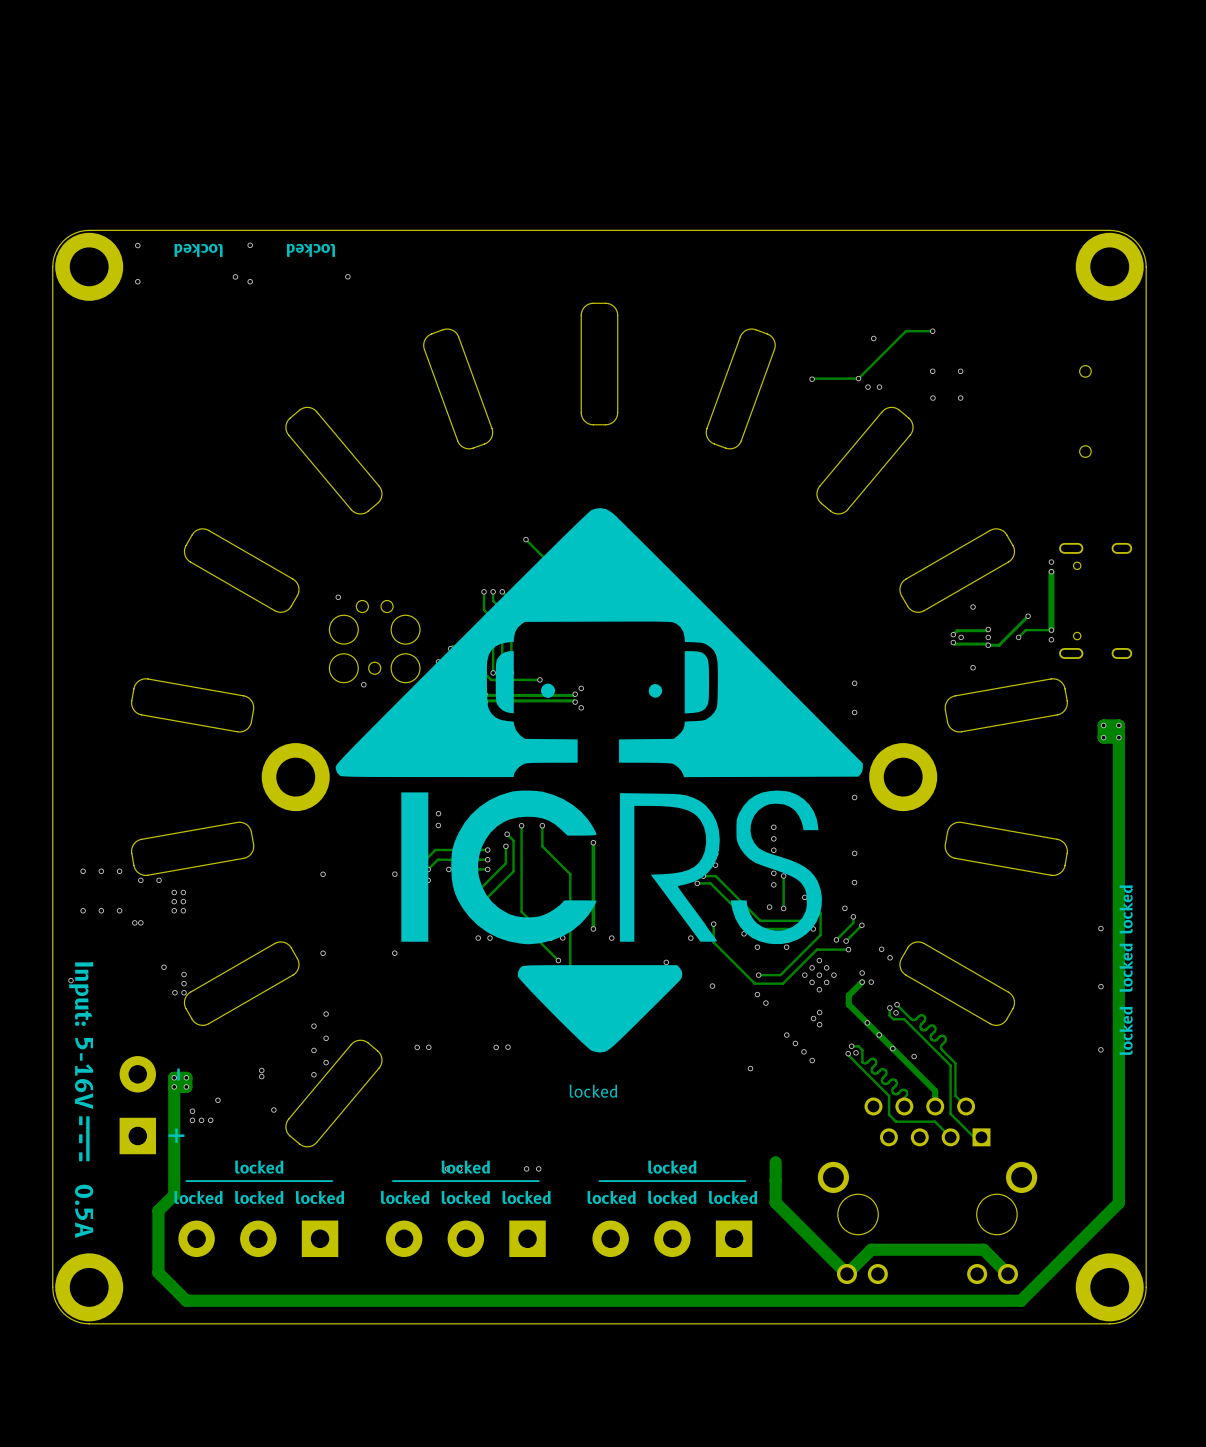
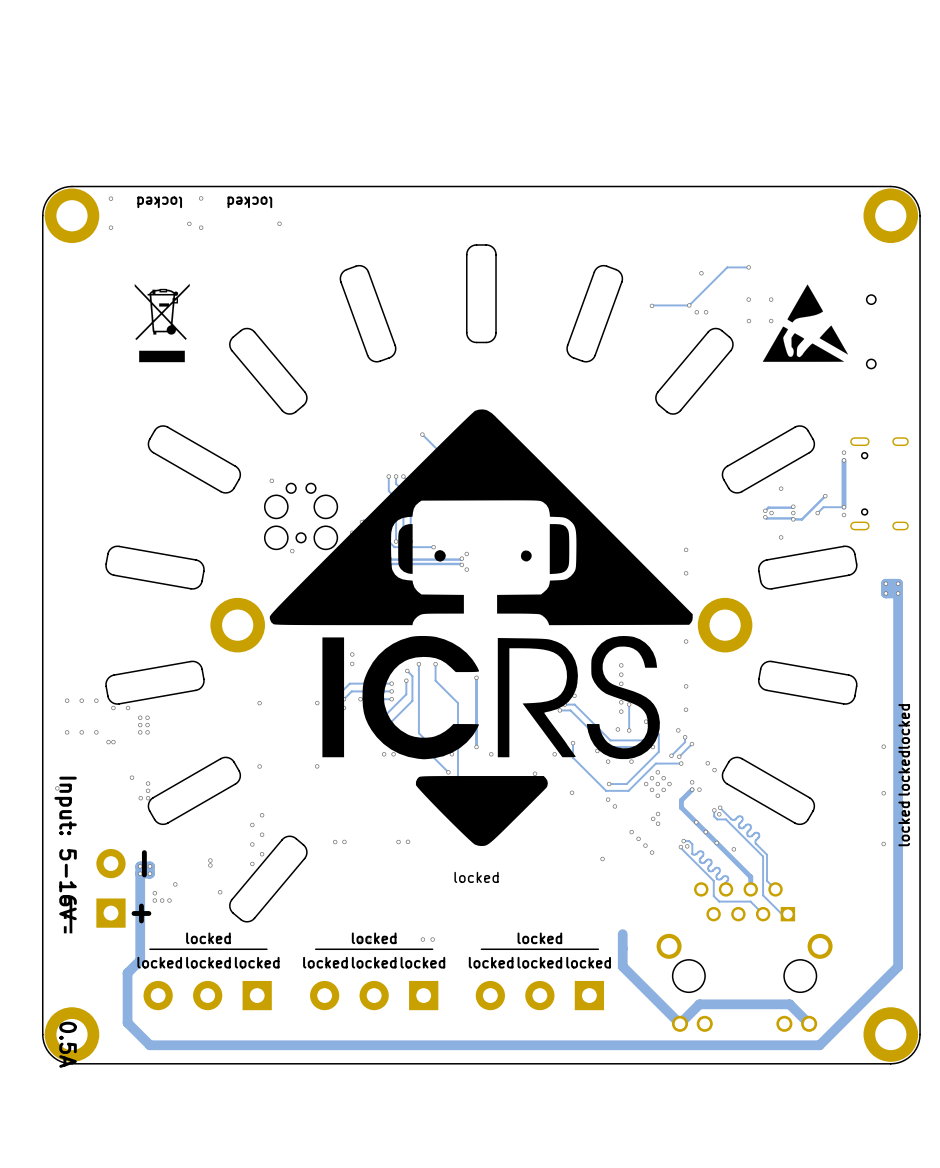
drawing: none -> [134, 283, 190, 363]
drawing: none -> [762, 284, 849, 362]

